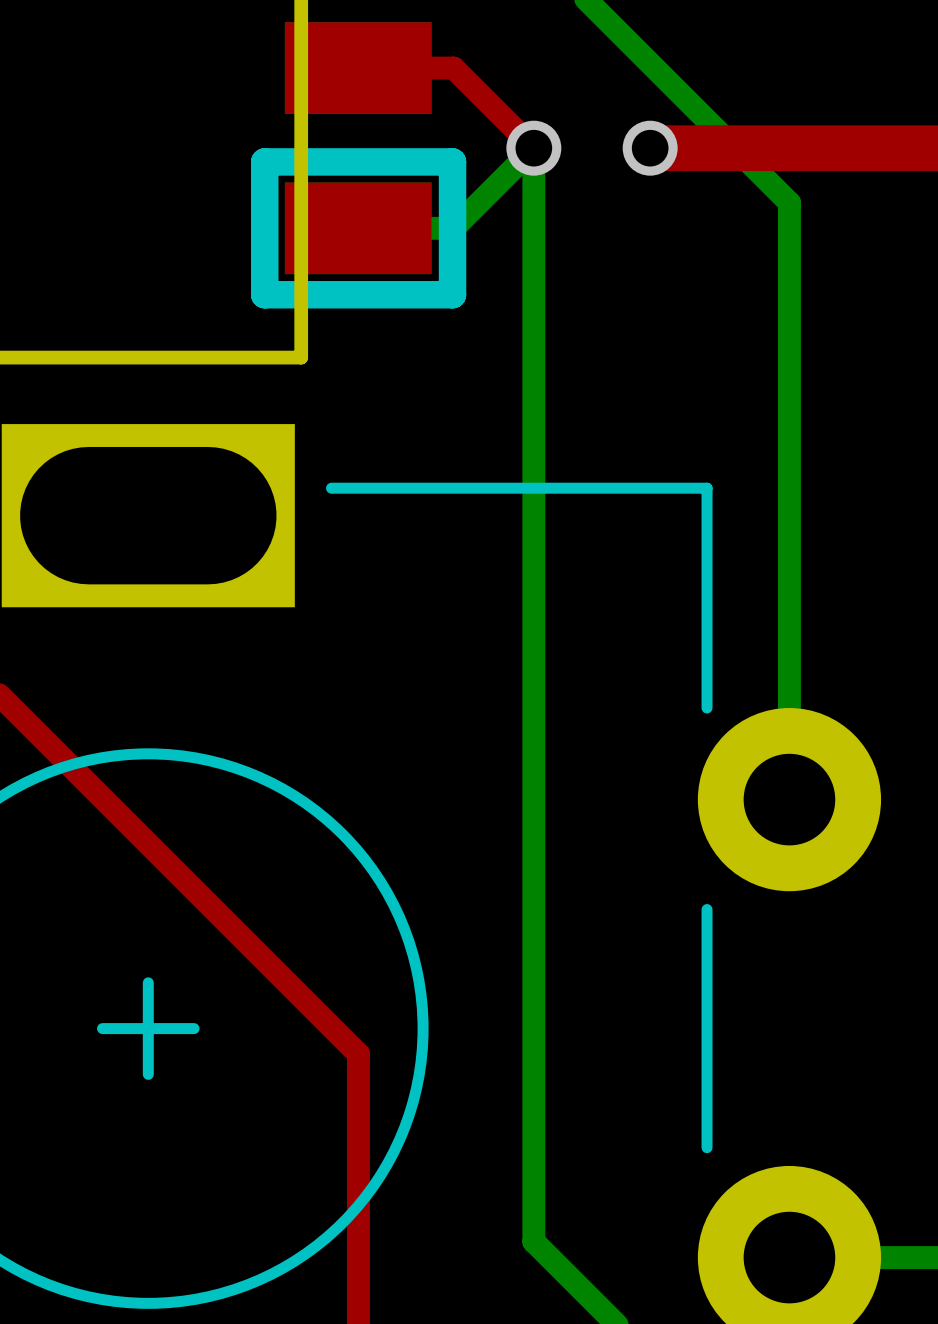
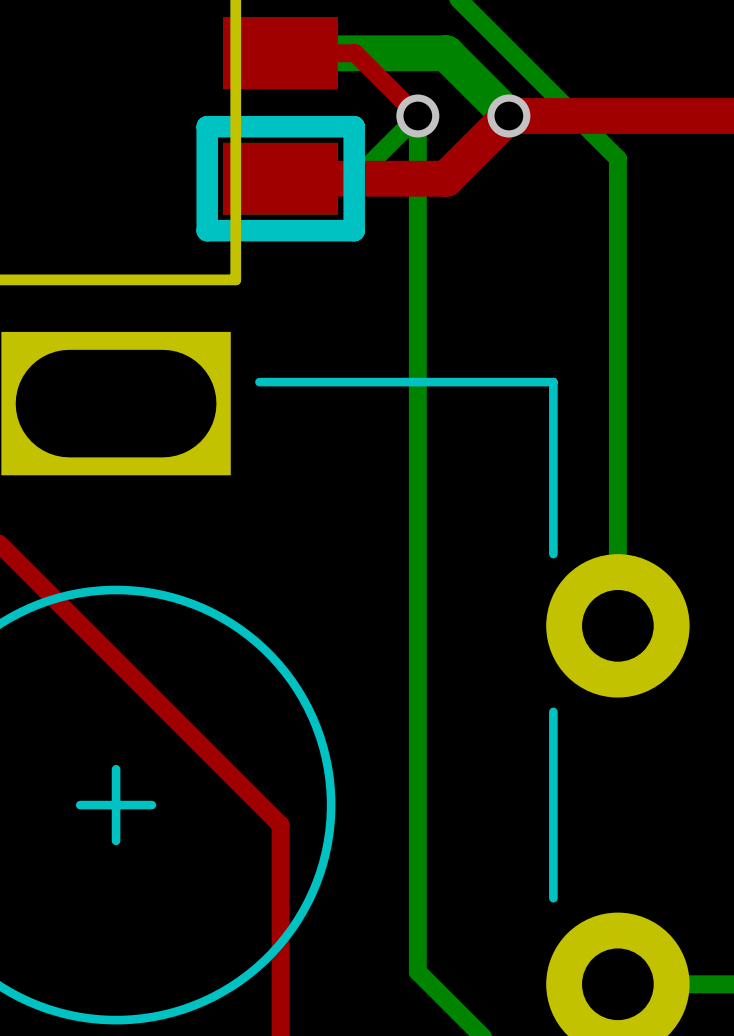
bottom track: none -> (280, 53) (446, 53) (508, 115)
top track: none -> (508, 115) (446, 178) (280, 178)

